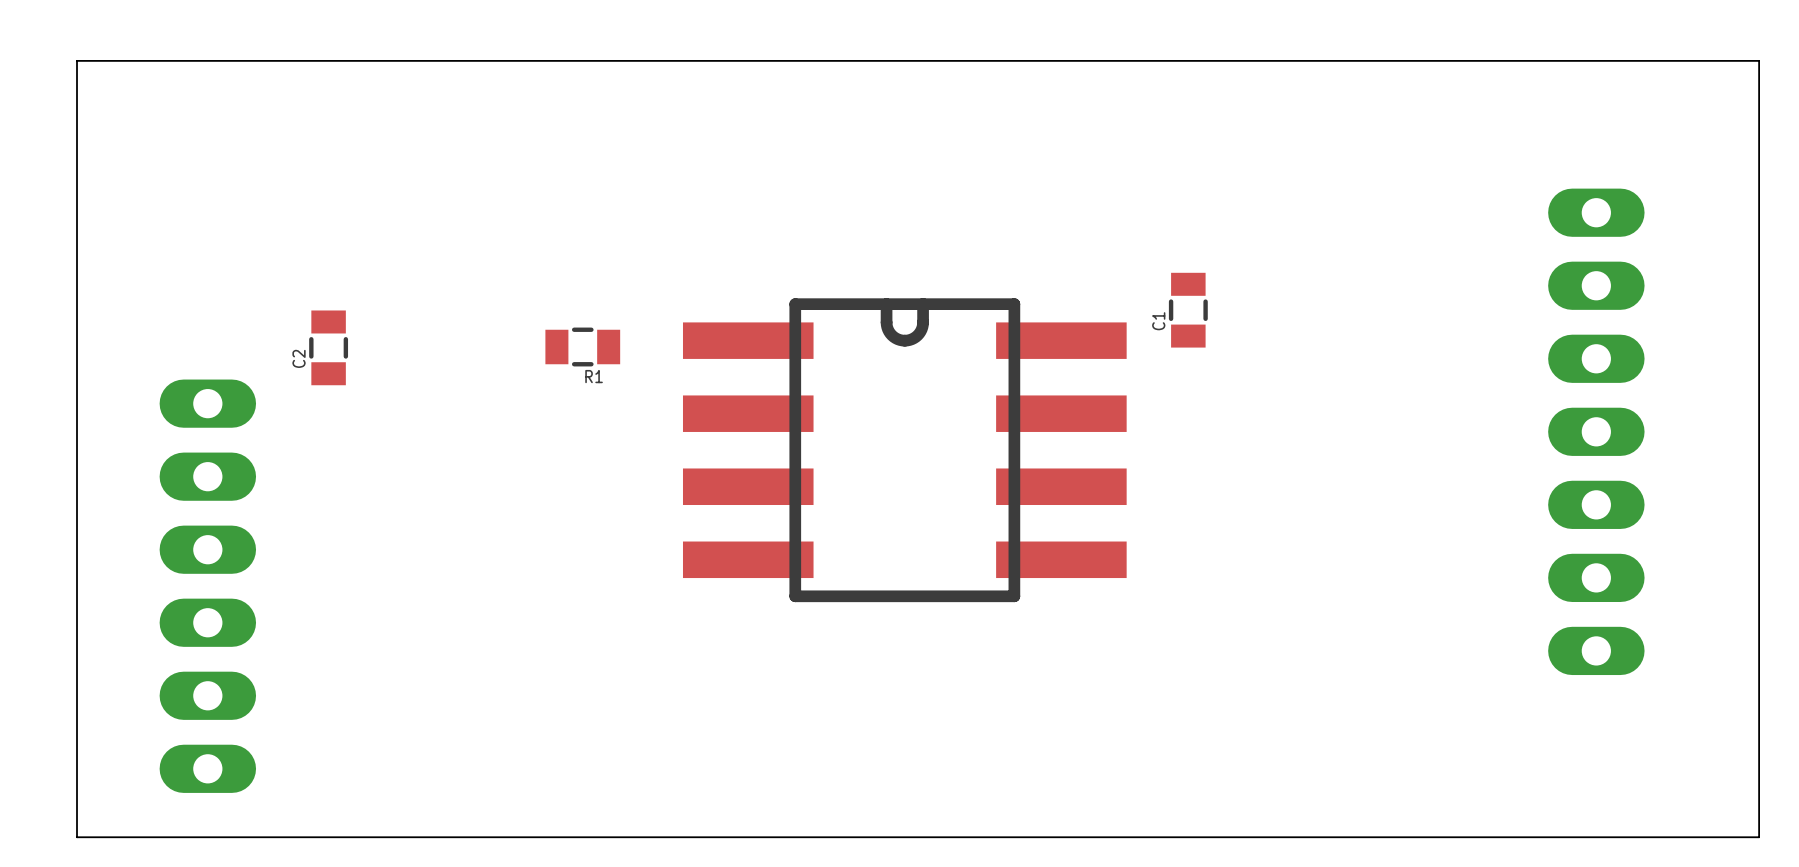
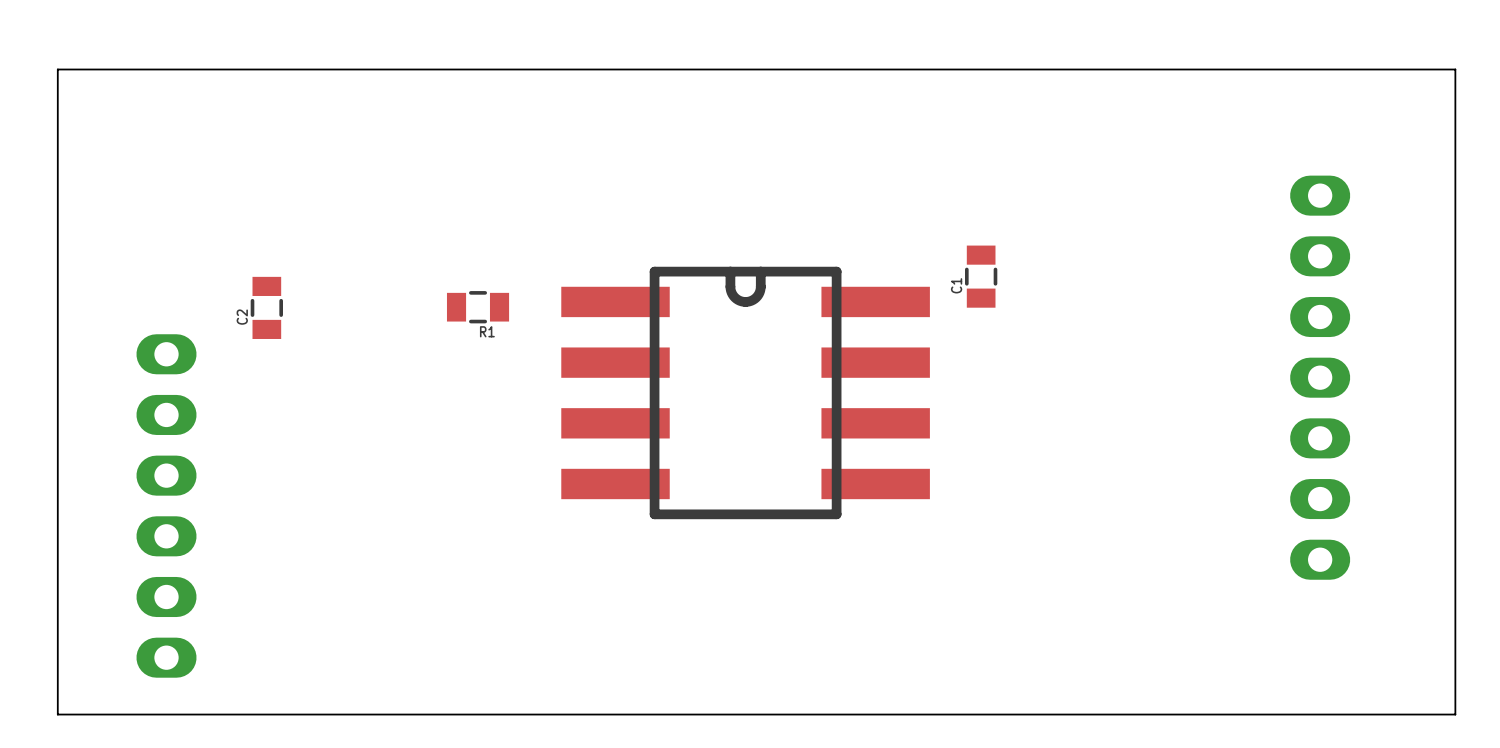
part footprint: [1548, 188, 1645, 676] -> [1290, 175, 1351, 580]
part footprint: [159, 379, 257, 793] -> [136, 334, 197, 678]

